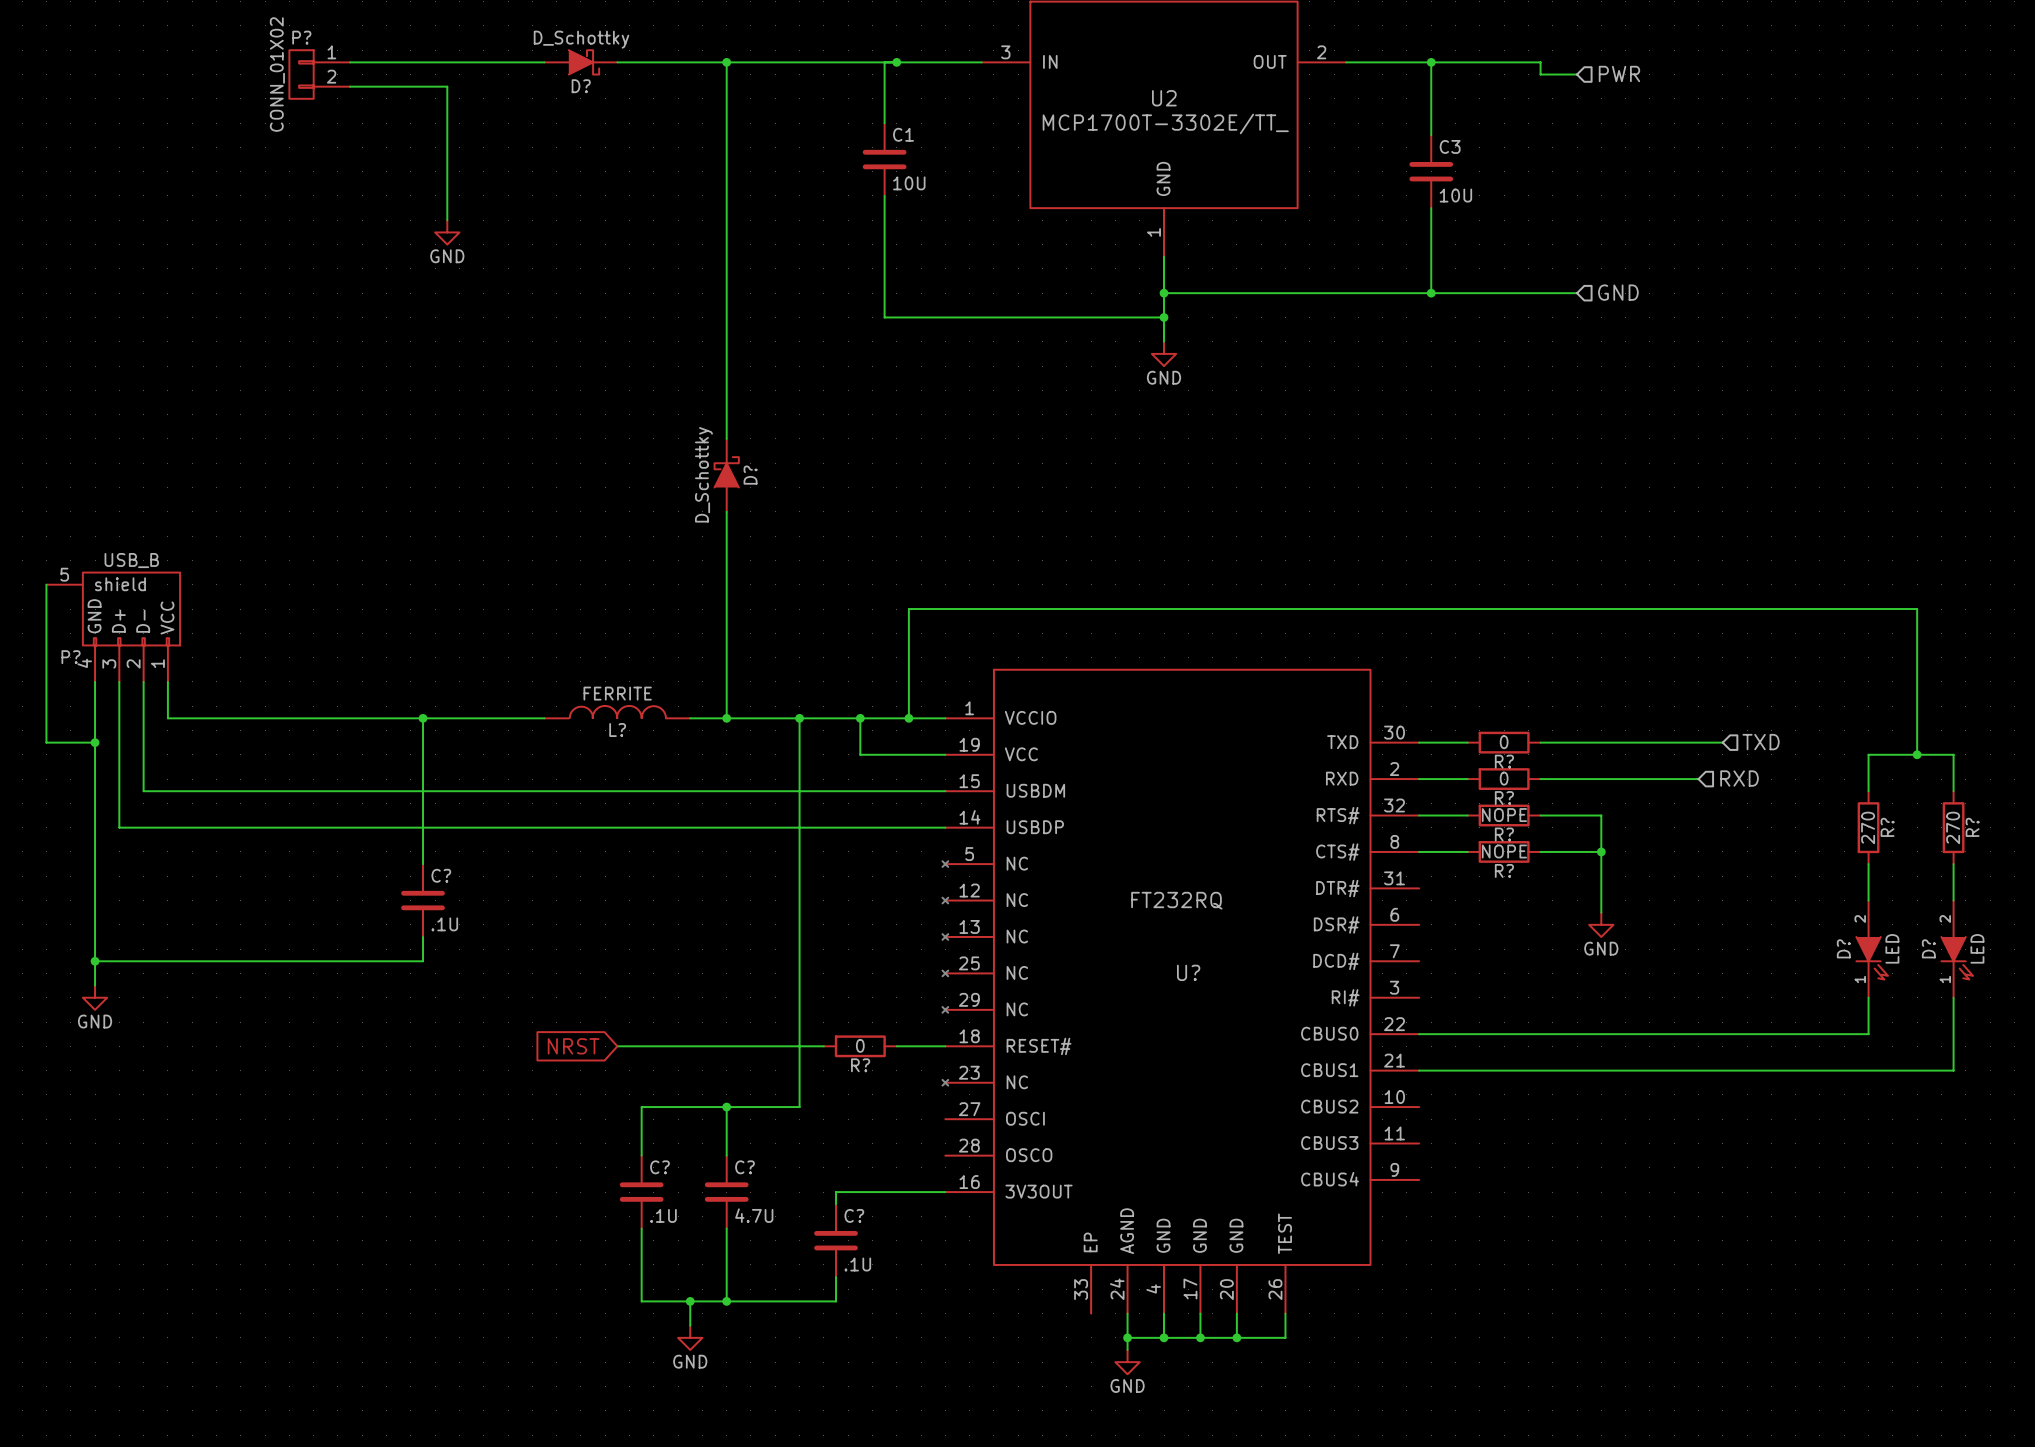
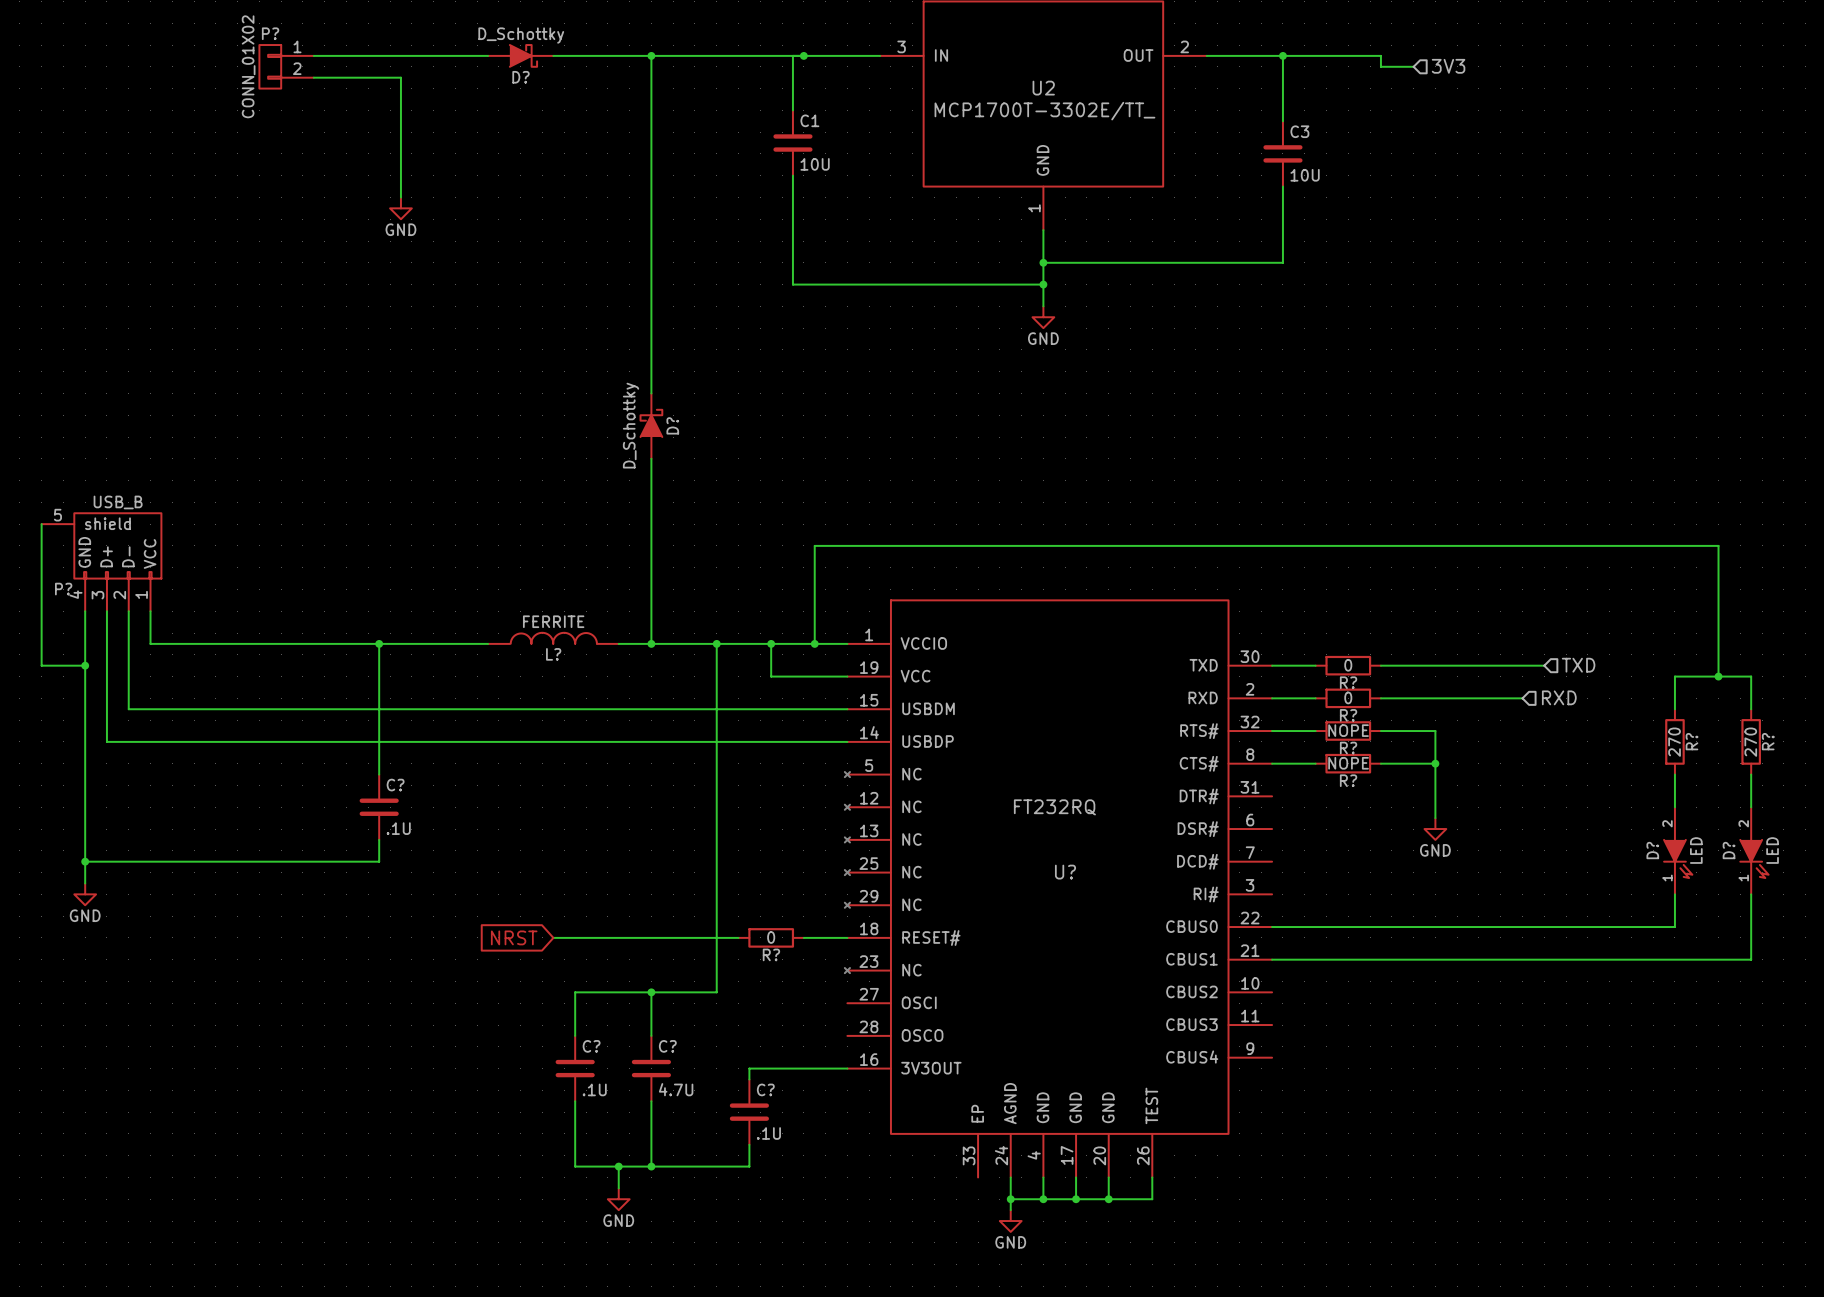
hierarchical label: PWR (1619, 73) -> 3V3 (1448, 66)
hierarchical label: GND (1618, 292) -> none
wire: (1431, 293) (1577, 293) -> none
junction: (1431, 293) -> none

